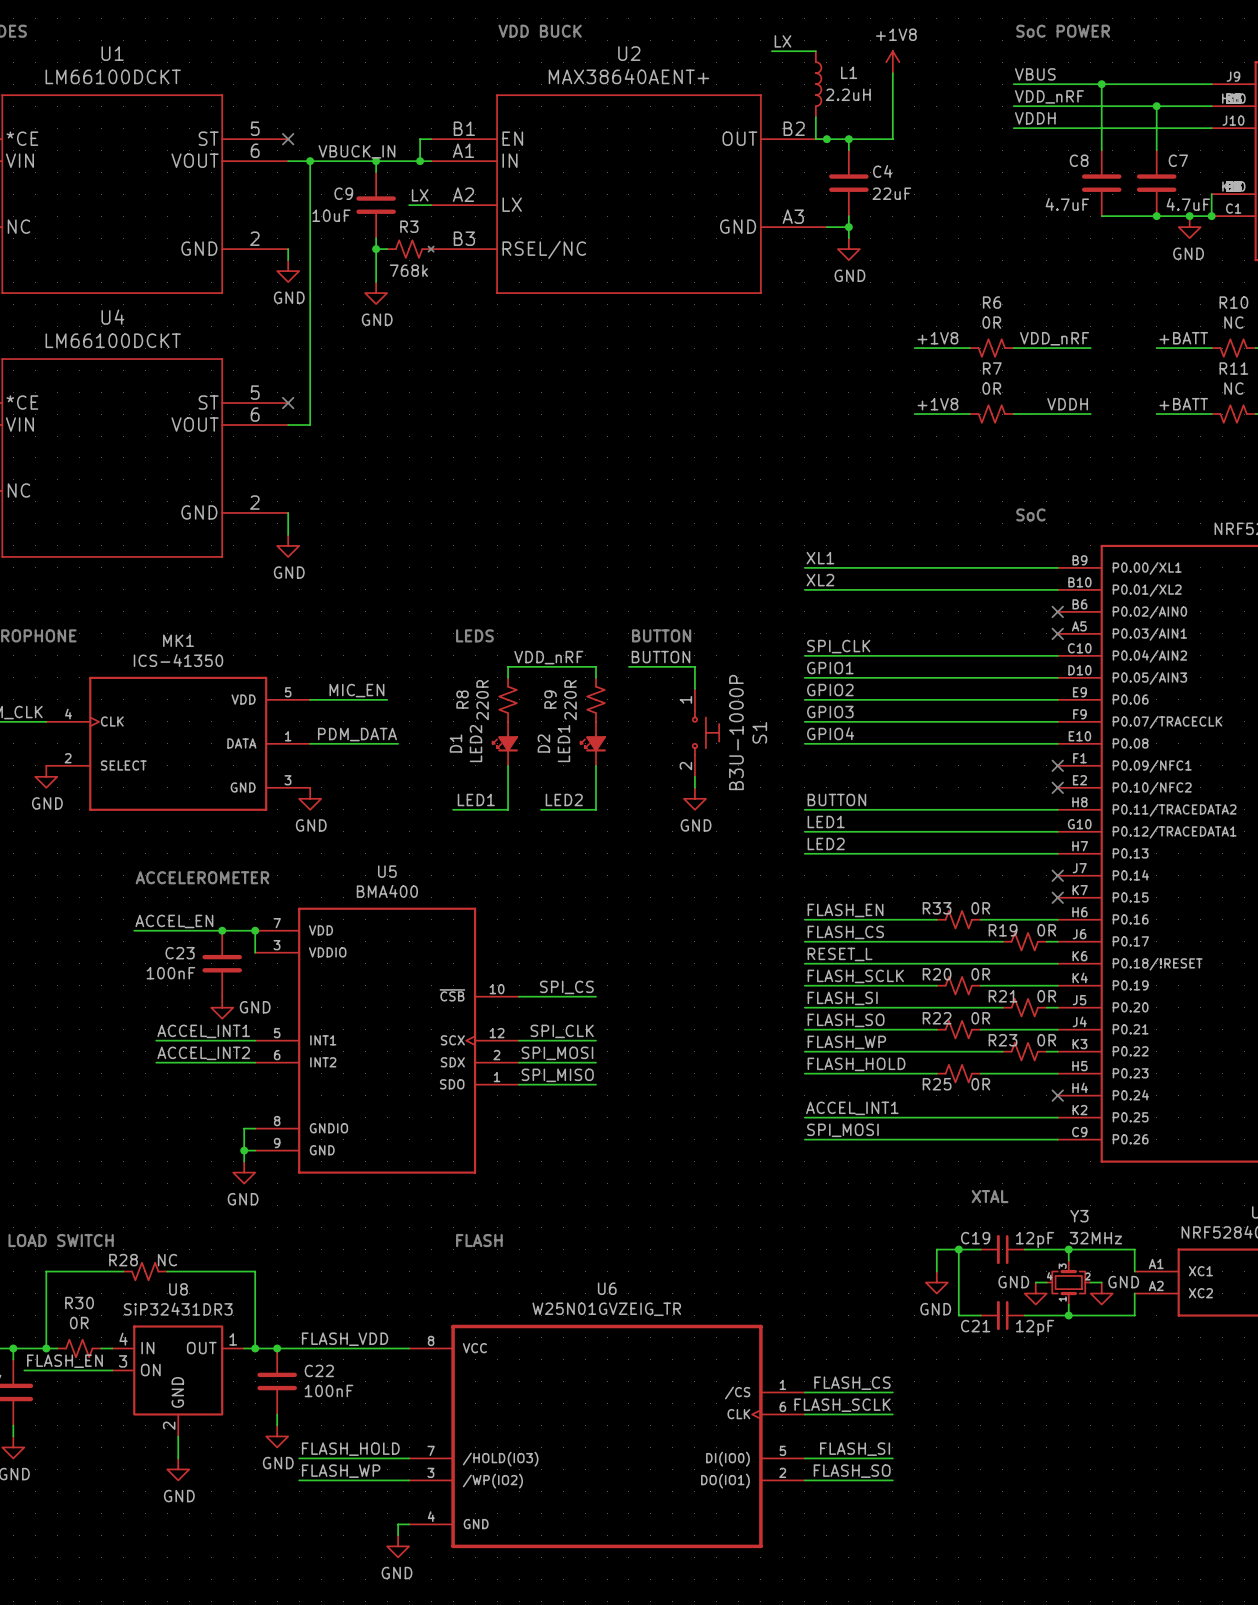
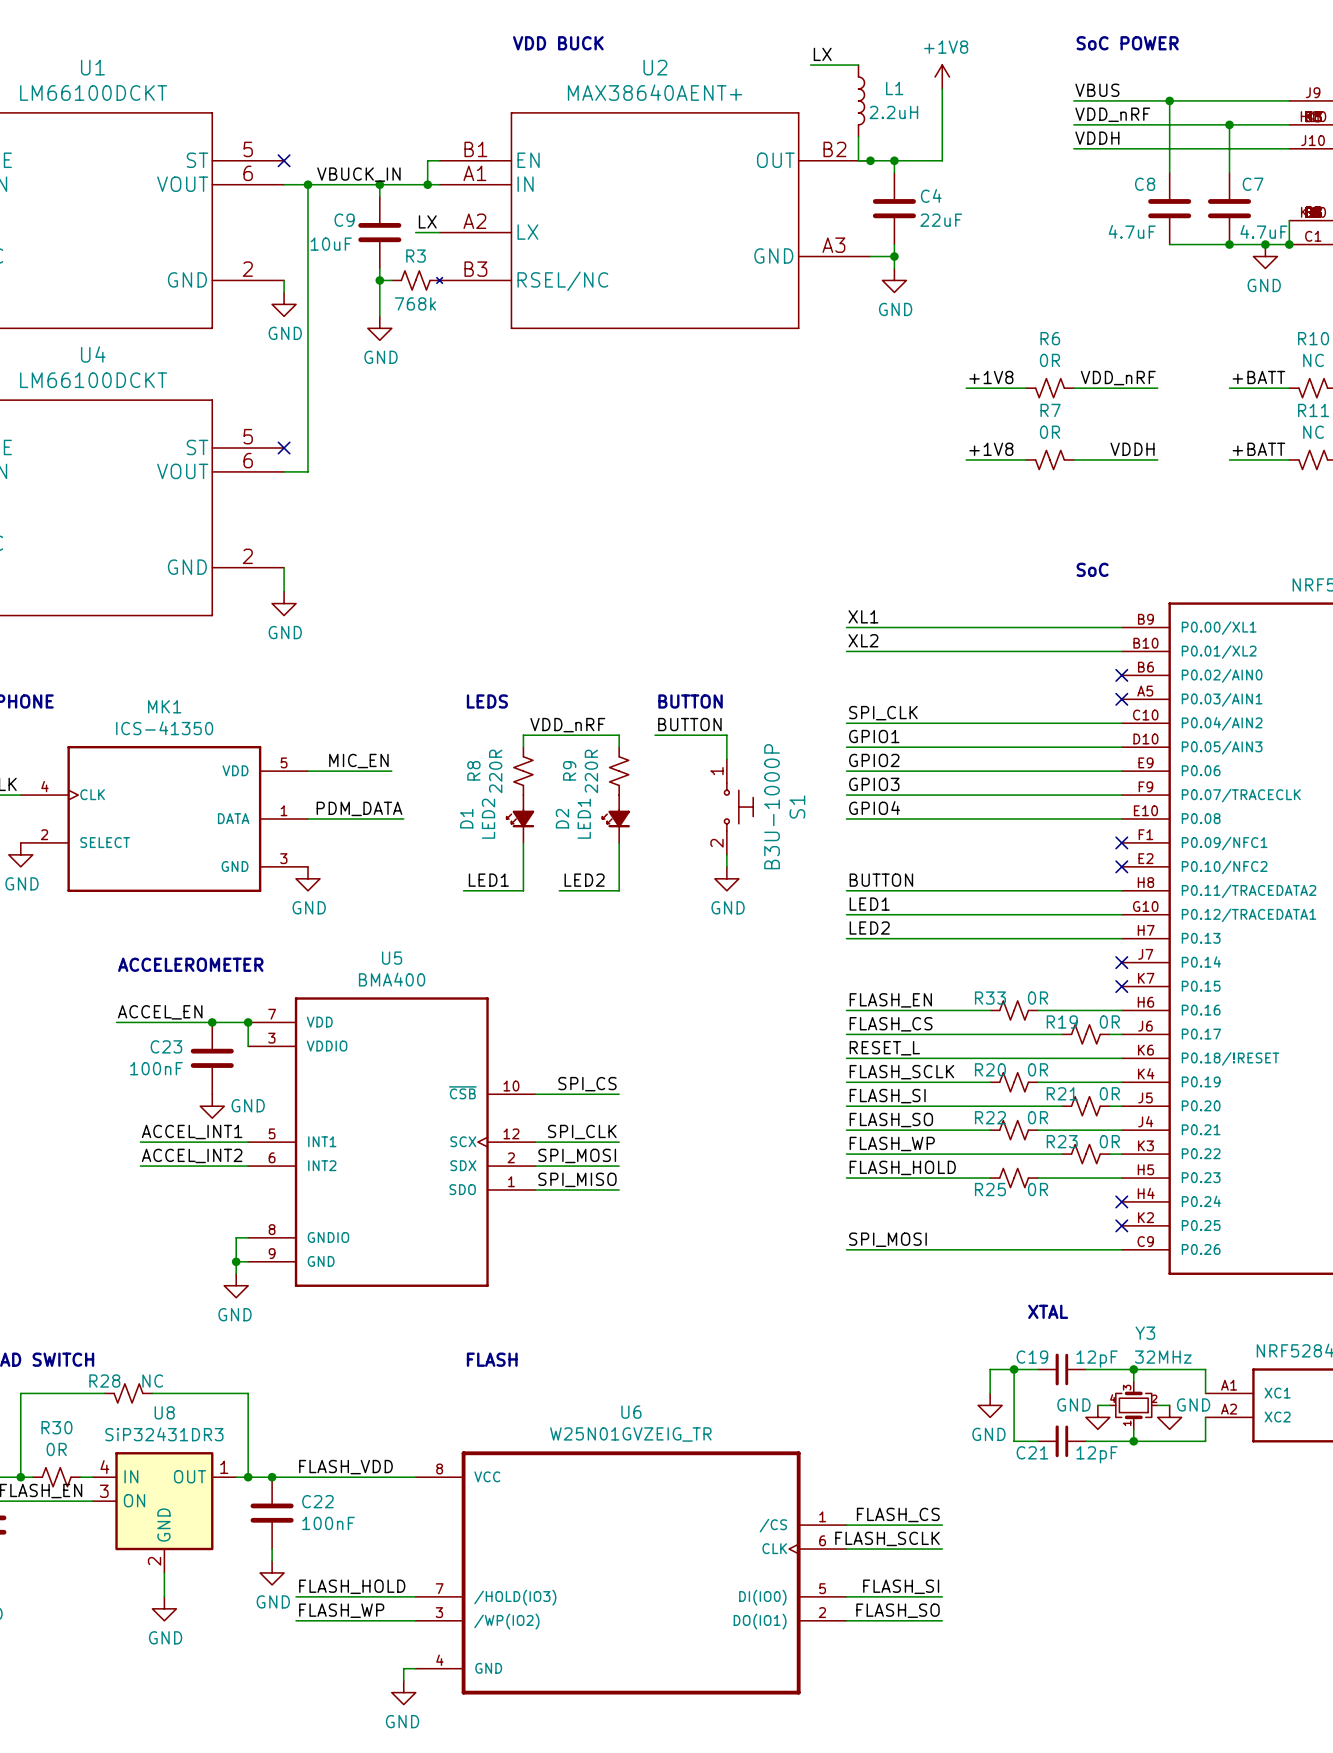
label: ACCEL_INT1 (852, 1108) -> none
wire: (804, 1117) (1057, 1117) -> none
no-connect mark: none -> (1121, 1225)

